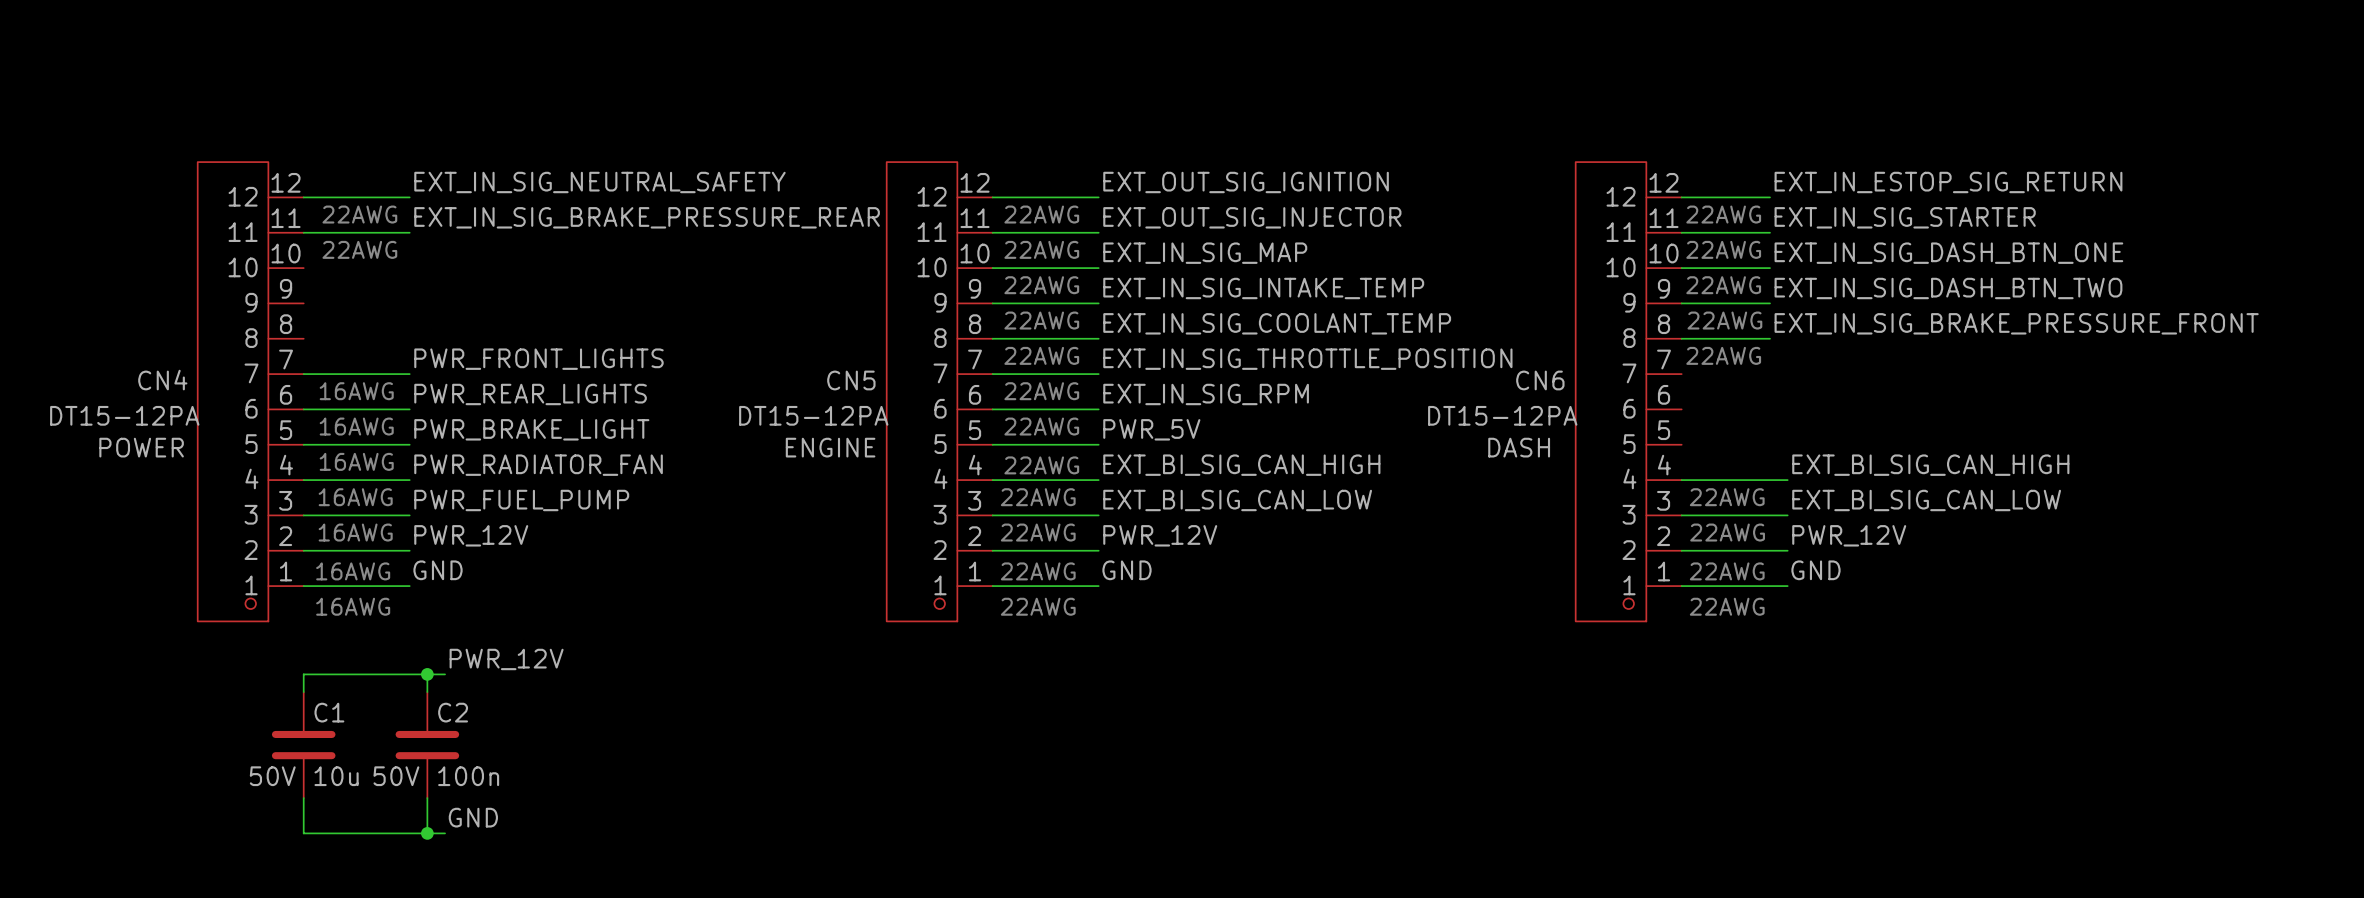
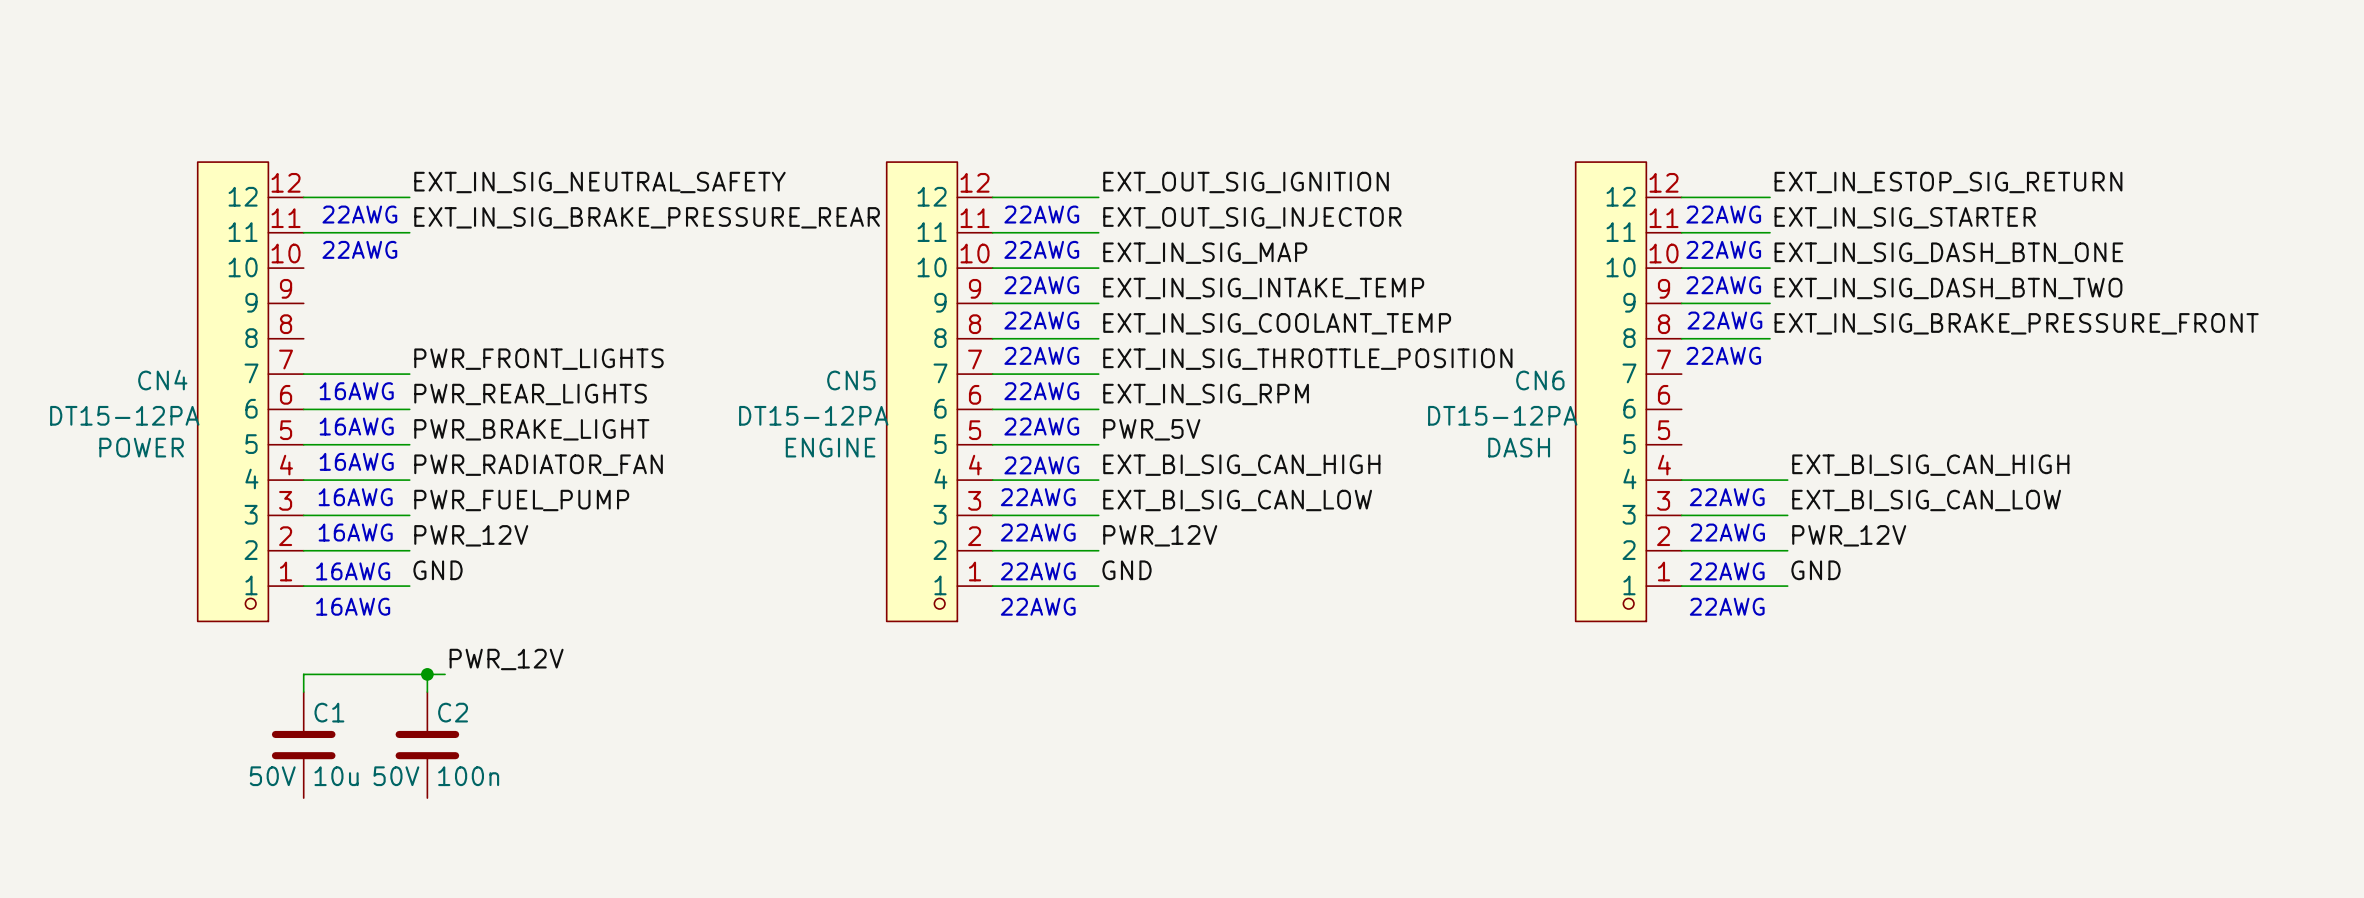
wire: (303, 798) (303, 833) (445, 833) -> none
wire: (427, 798) (427, 833) -> none
label: GND (473, 817) -> none
junction: (427, 833) -> none

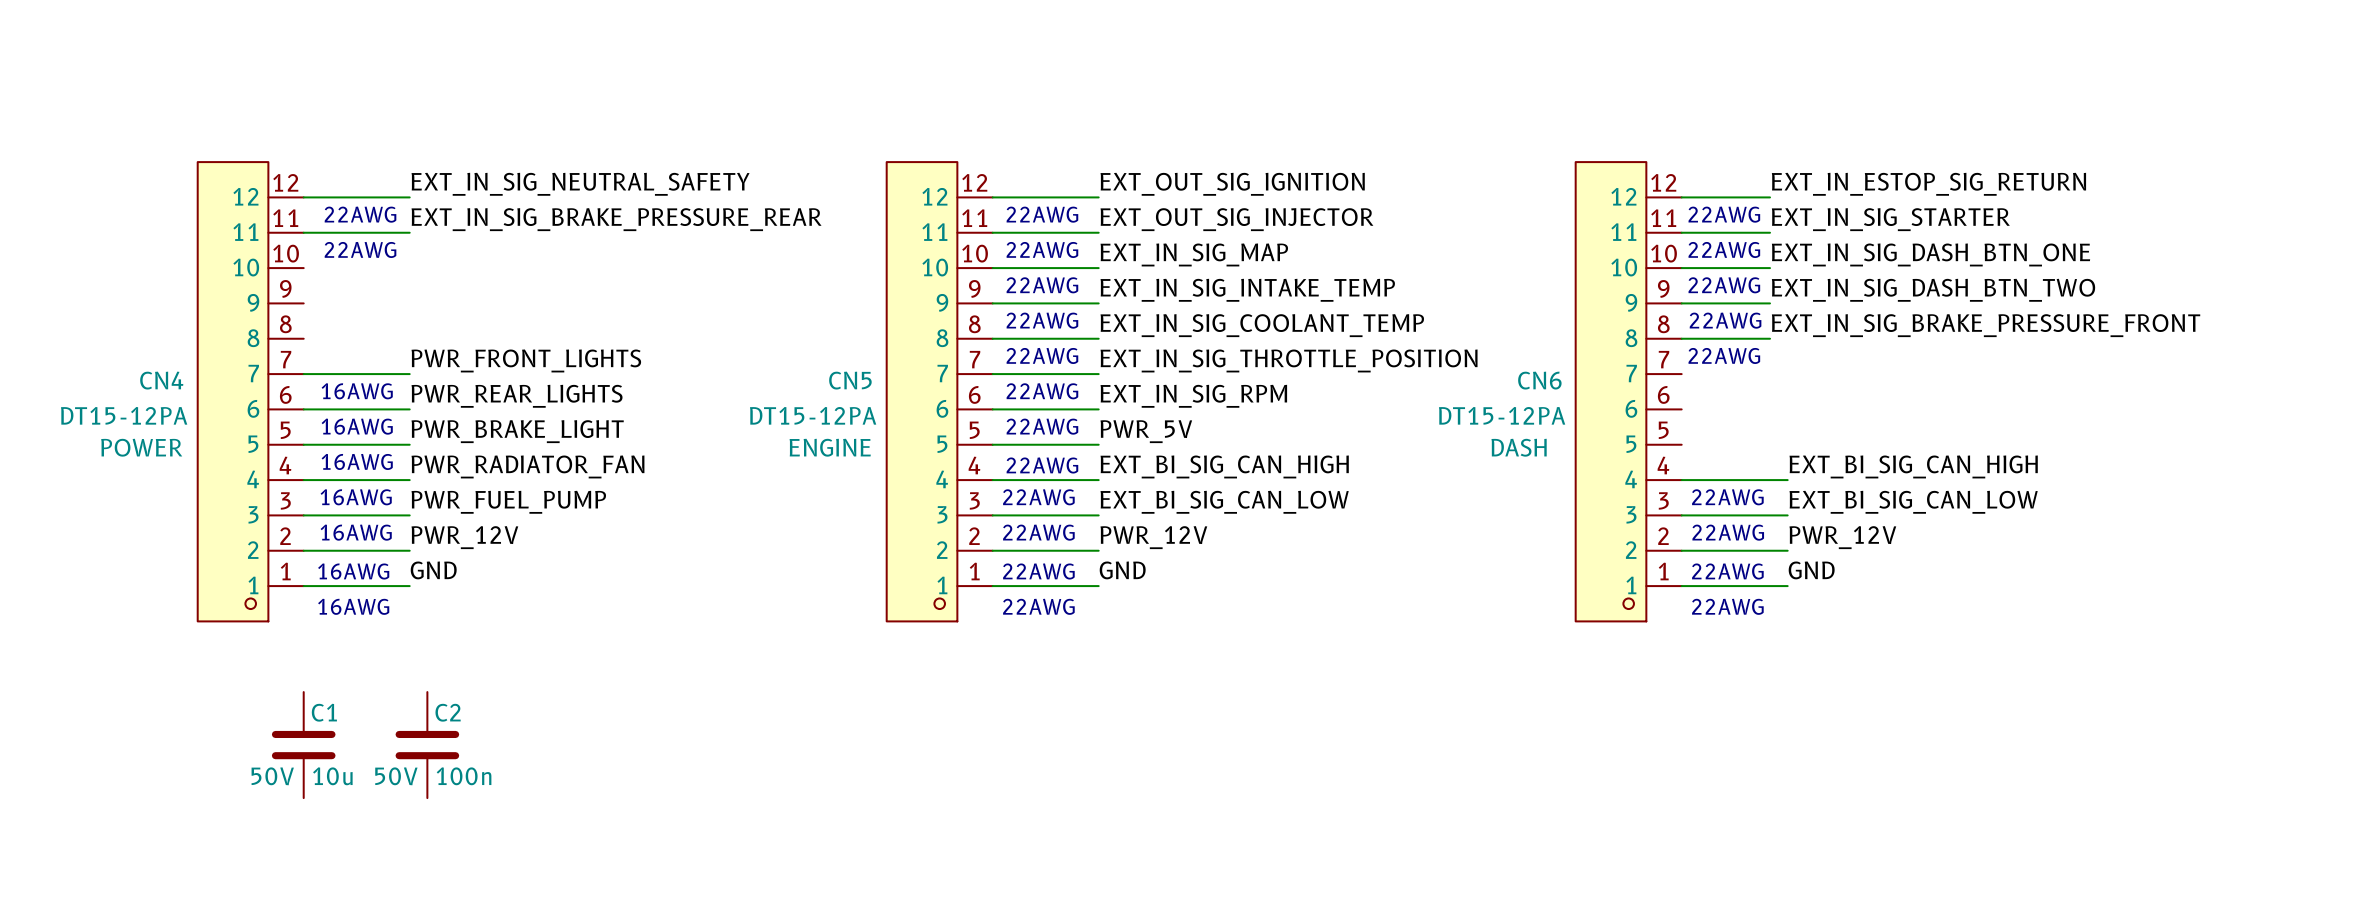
label: PWR_12V (506, 659) -> none
wire: (427, 674) (427, 692) -> none
junction: (427, 674) -> none
wire: (445, 674) (303, 674) (303, 692) -> none

